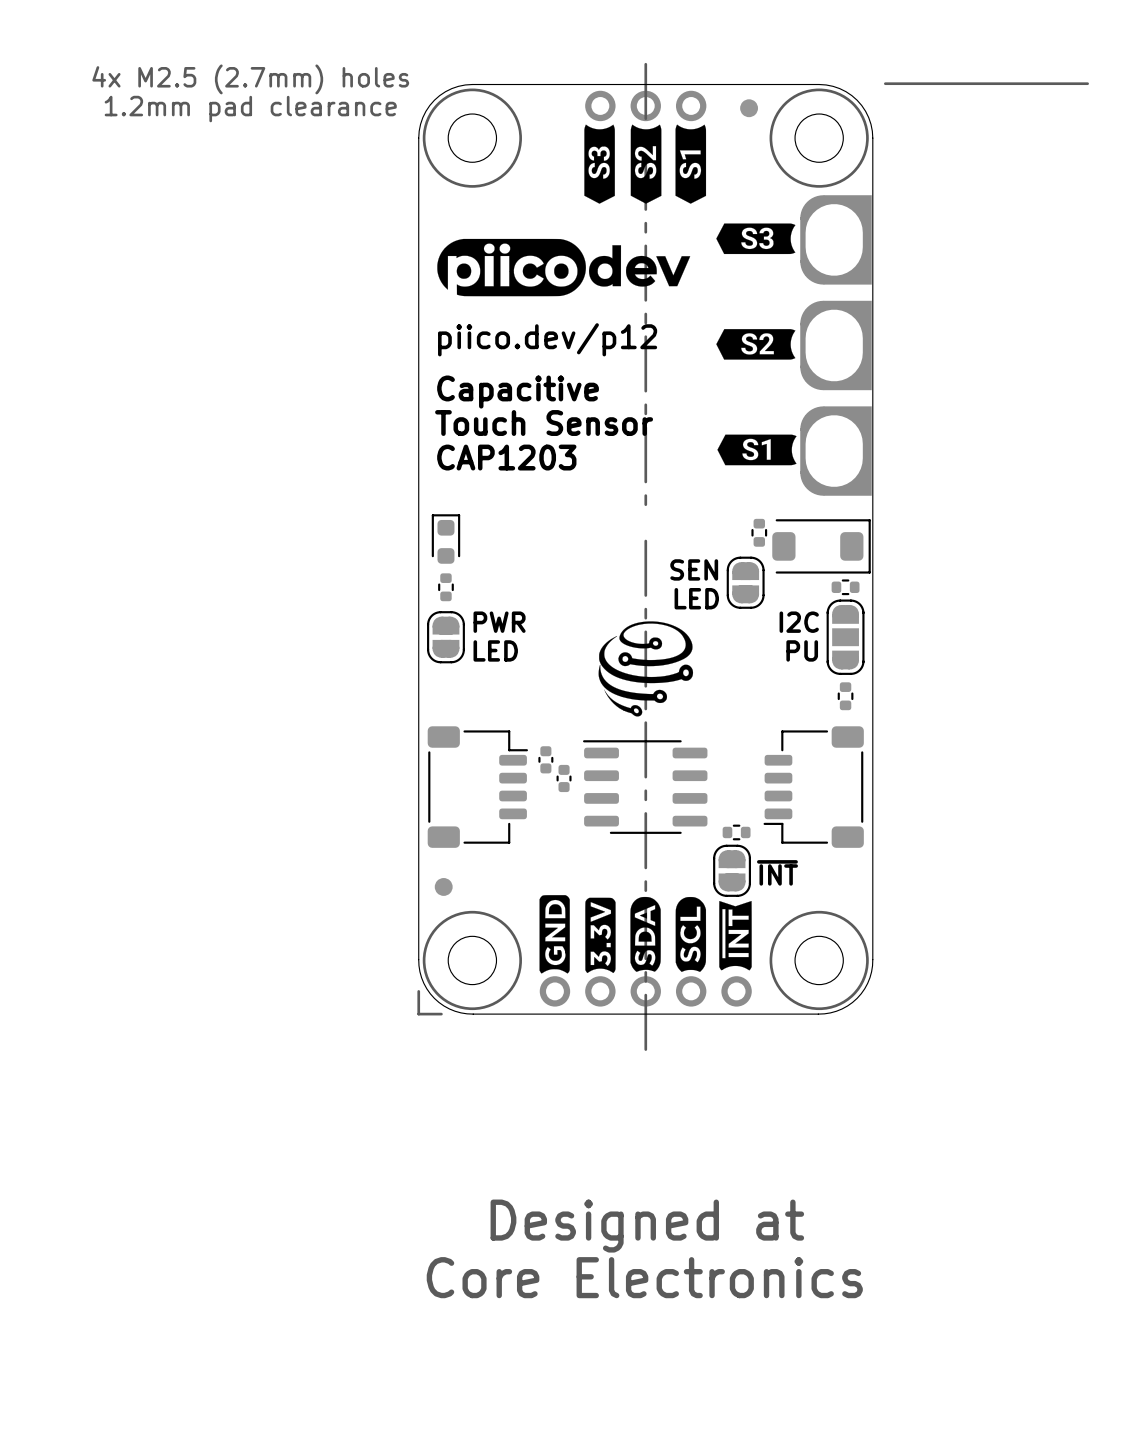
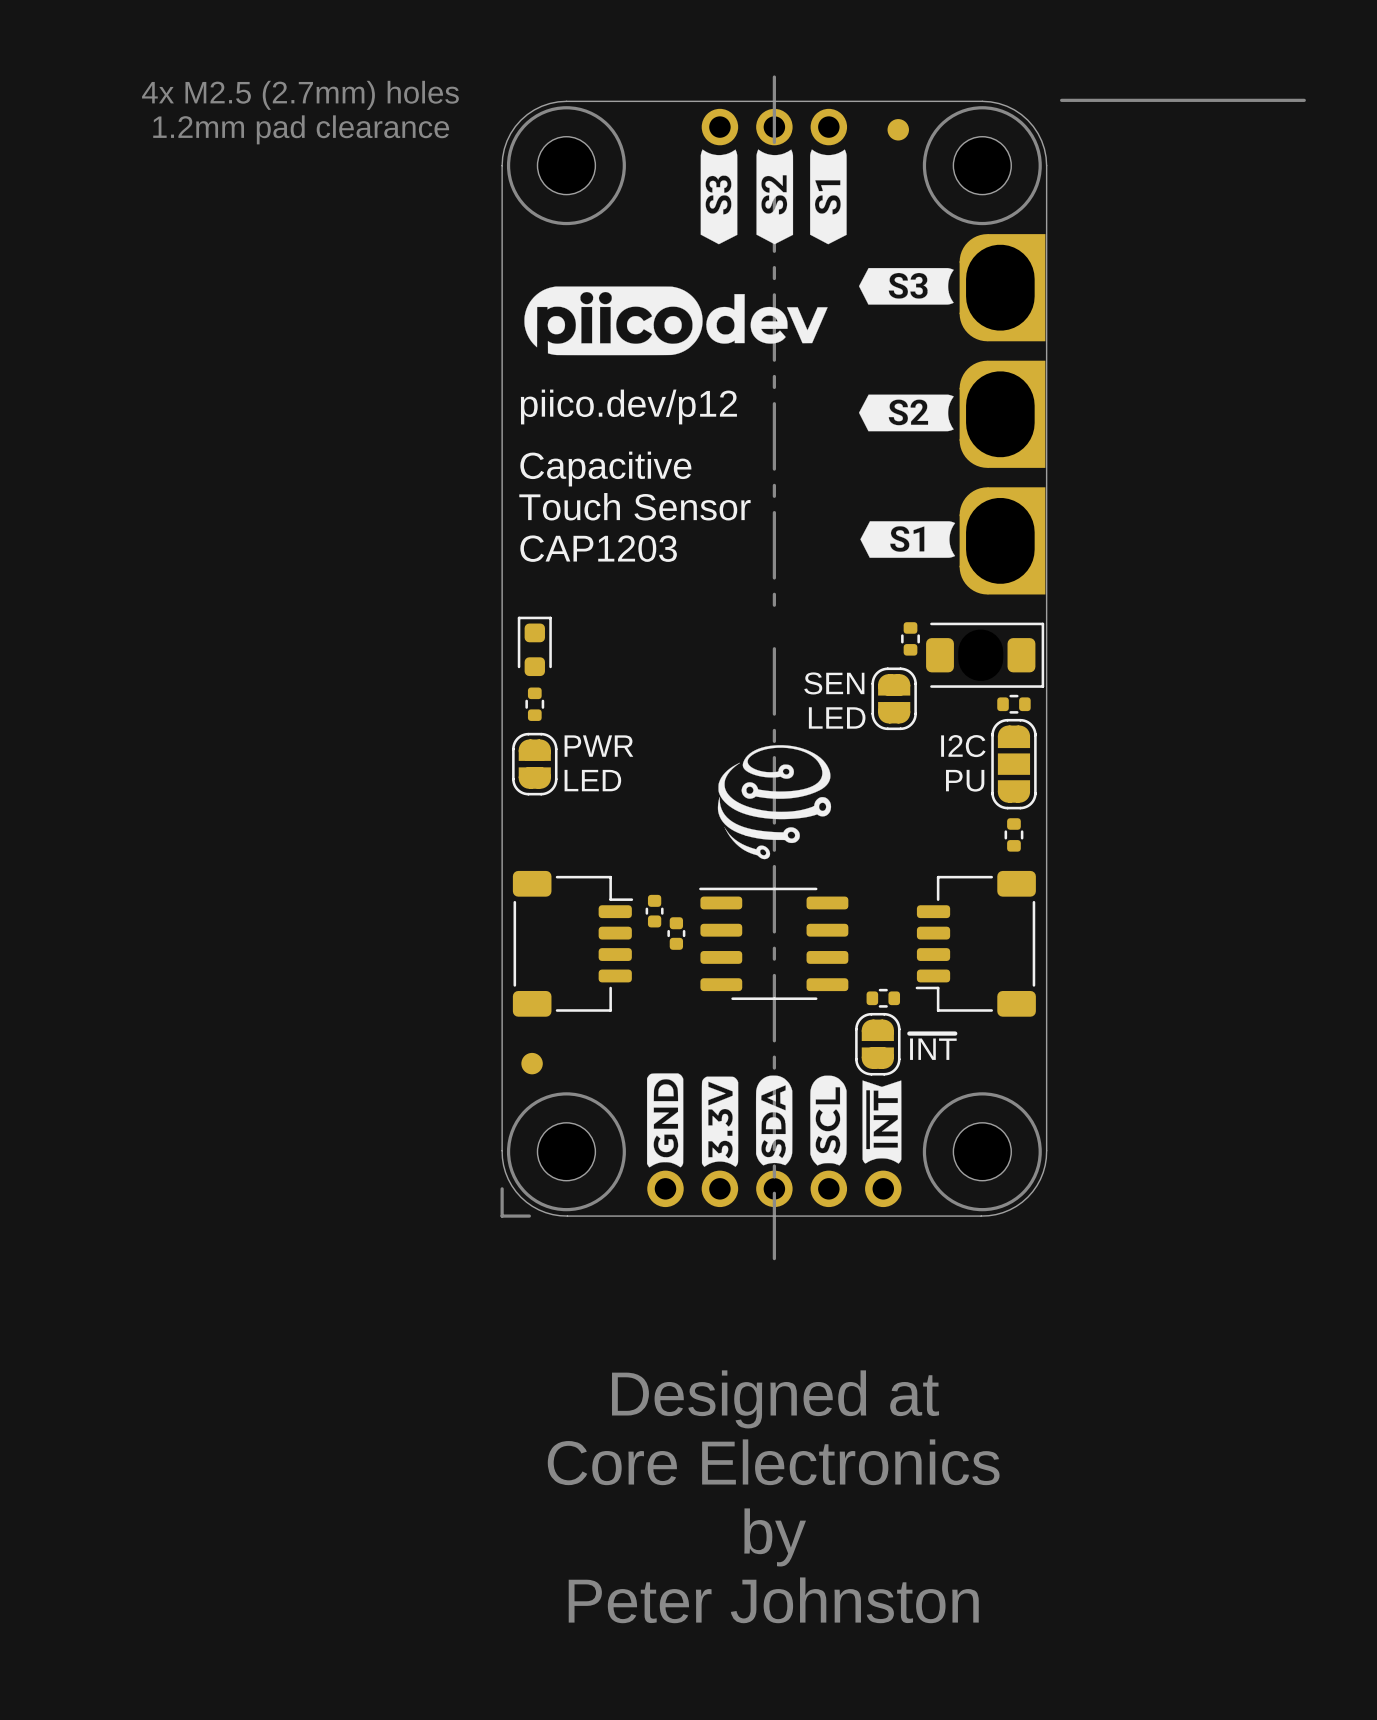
text: none -> Designed at (775, 1399)
text: Designed at (647, 1226) -> Core Electronics (773, 1462)
text: Core Electronics (644, 1277) -> by (775, 1537)
text: none -> Peter Johnston (773, 1600)

